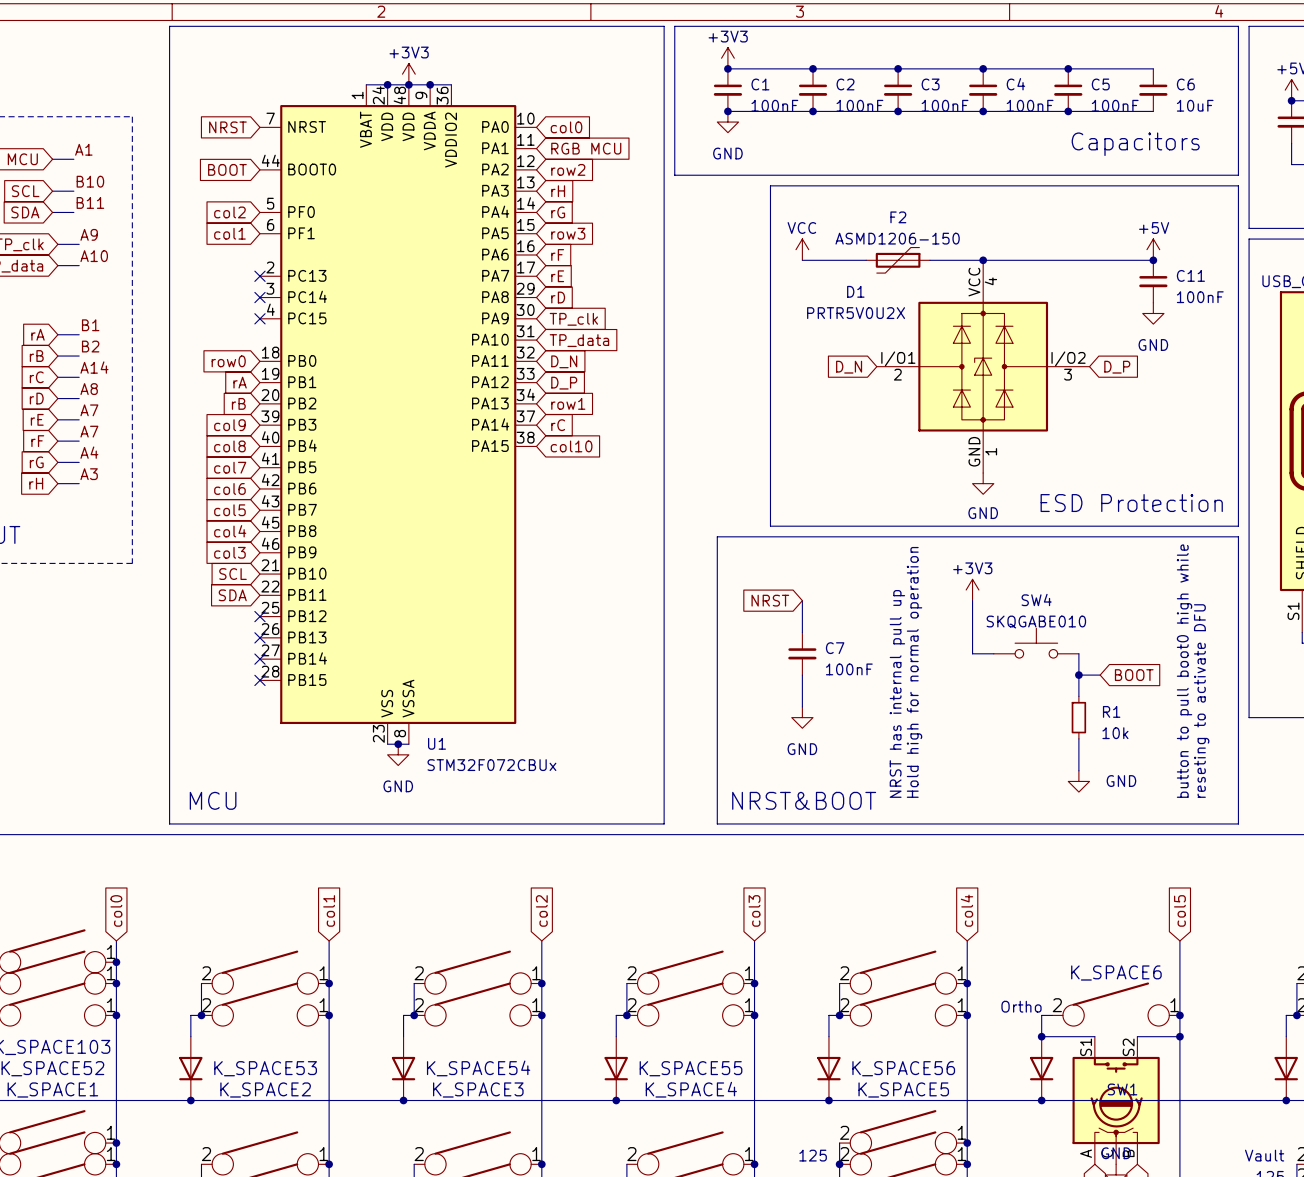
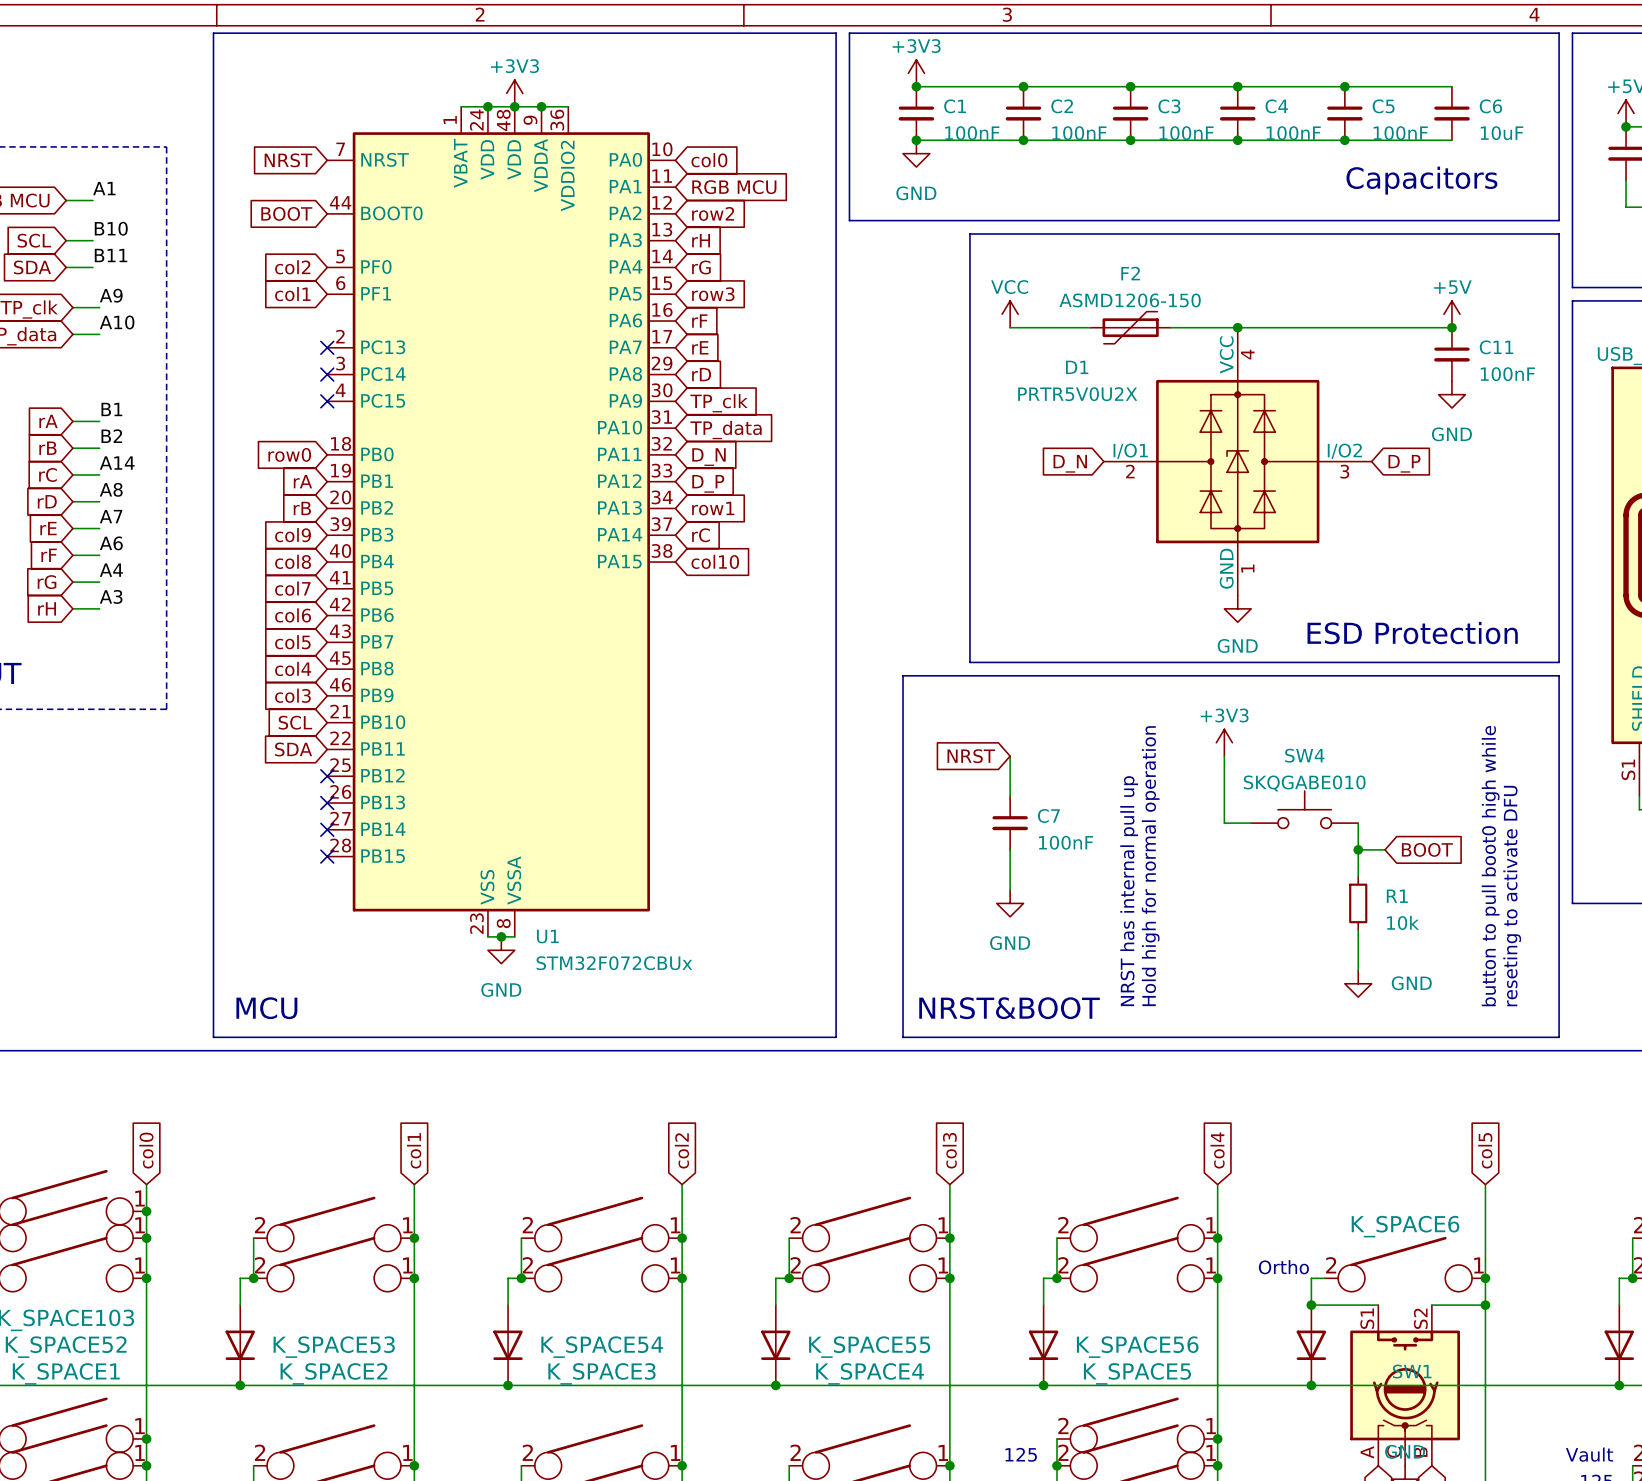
label: A7 (89, 431) -> A6 (111, 543)

